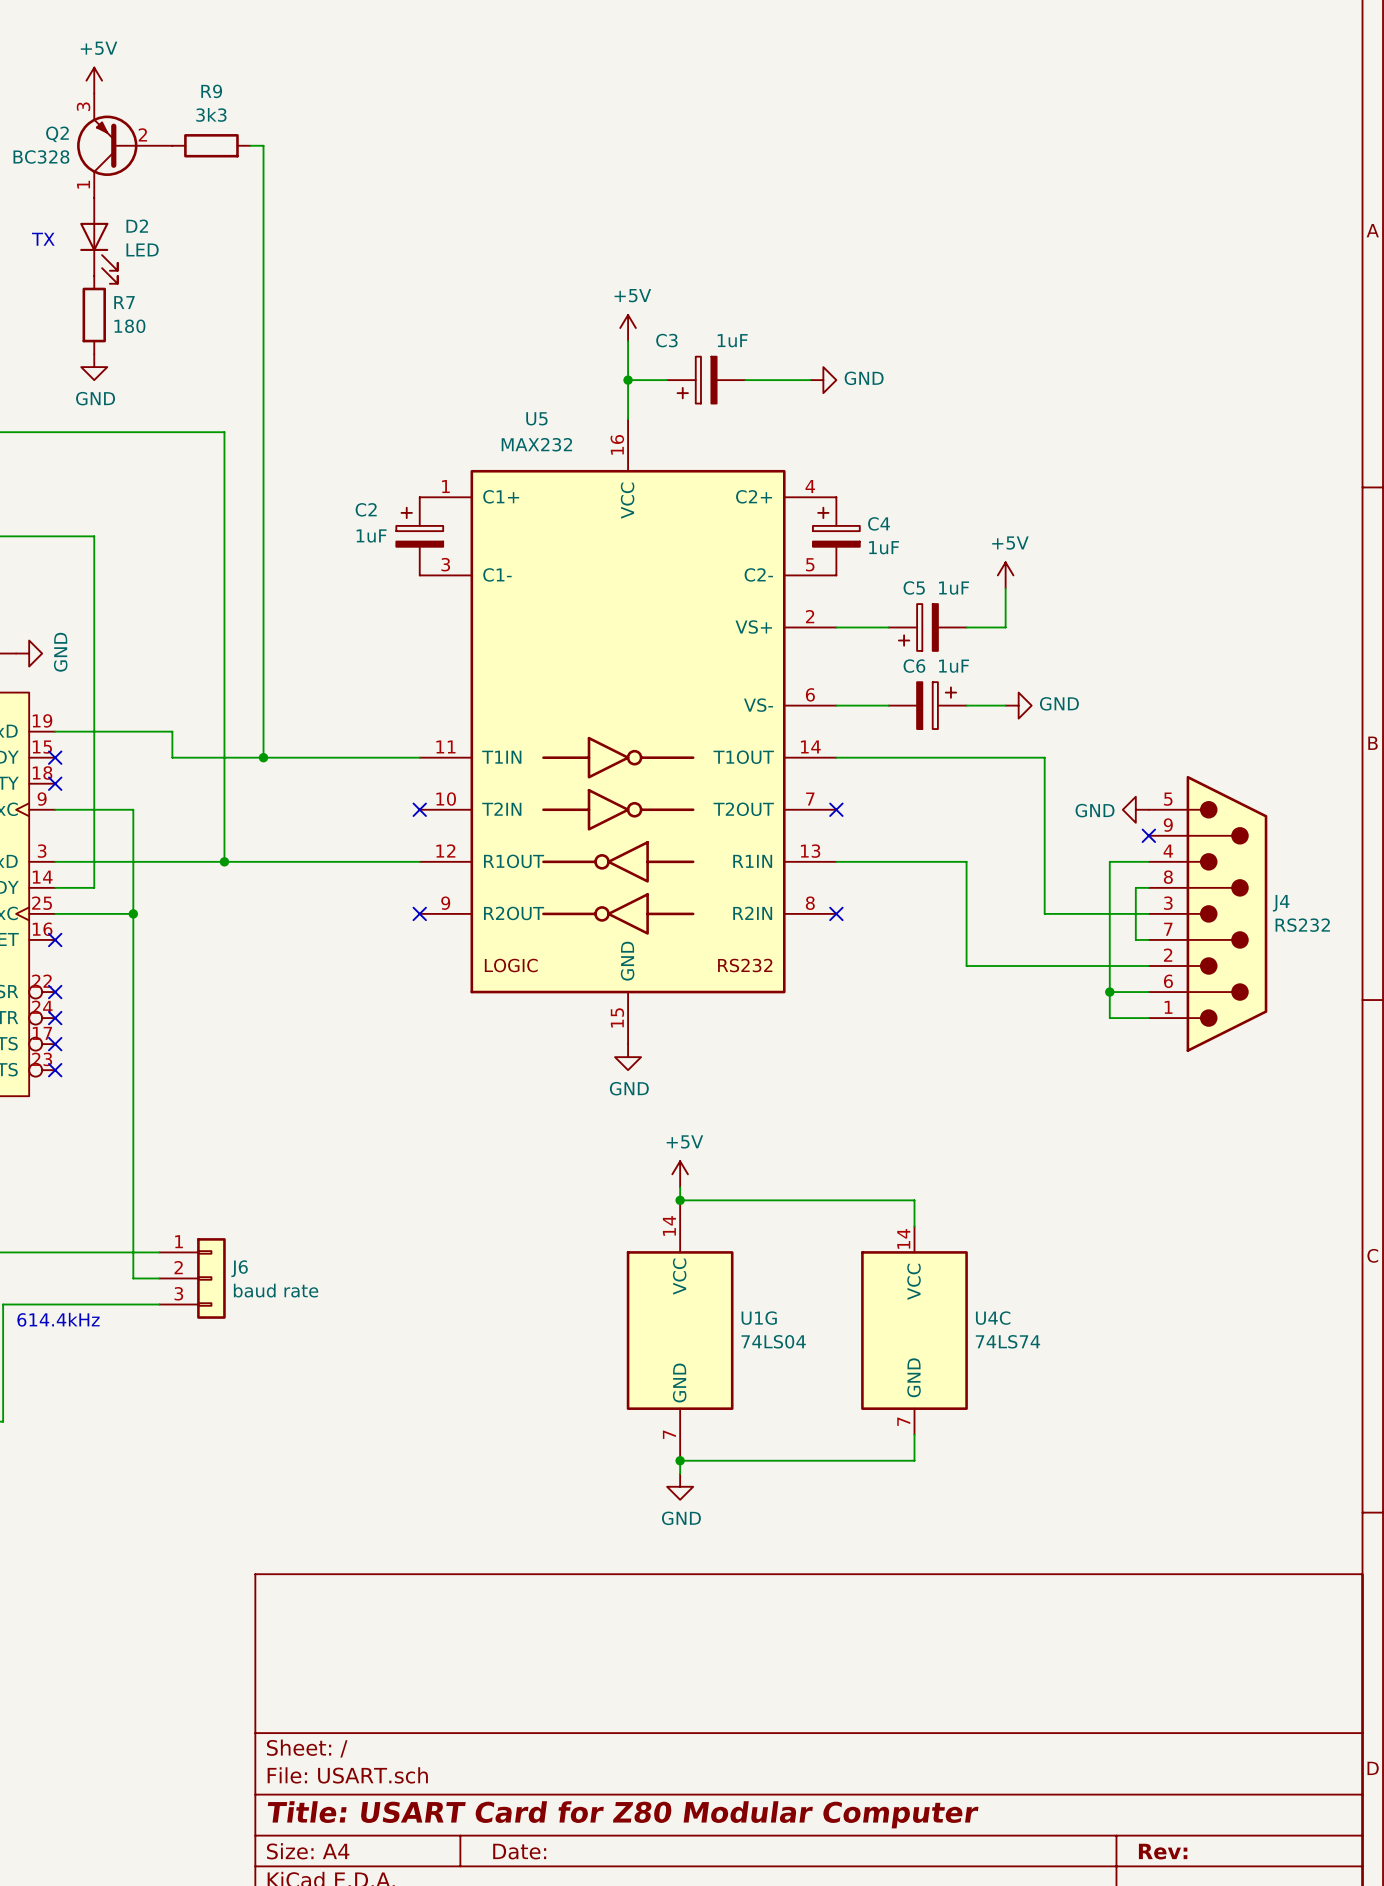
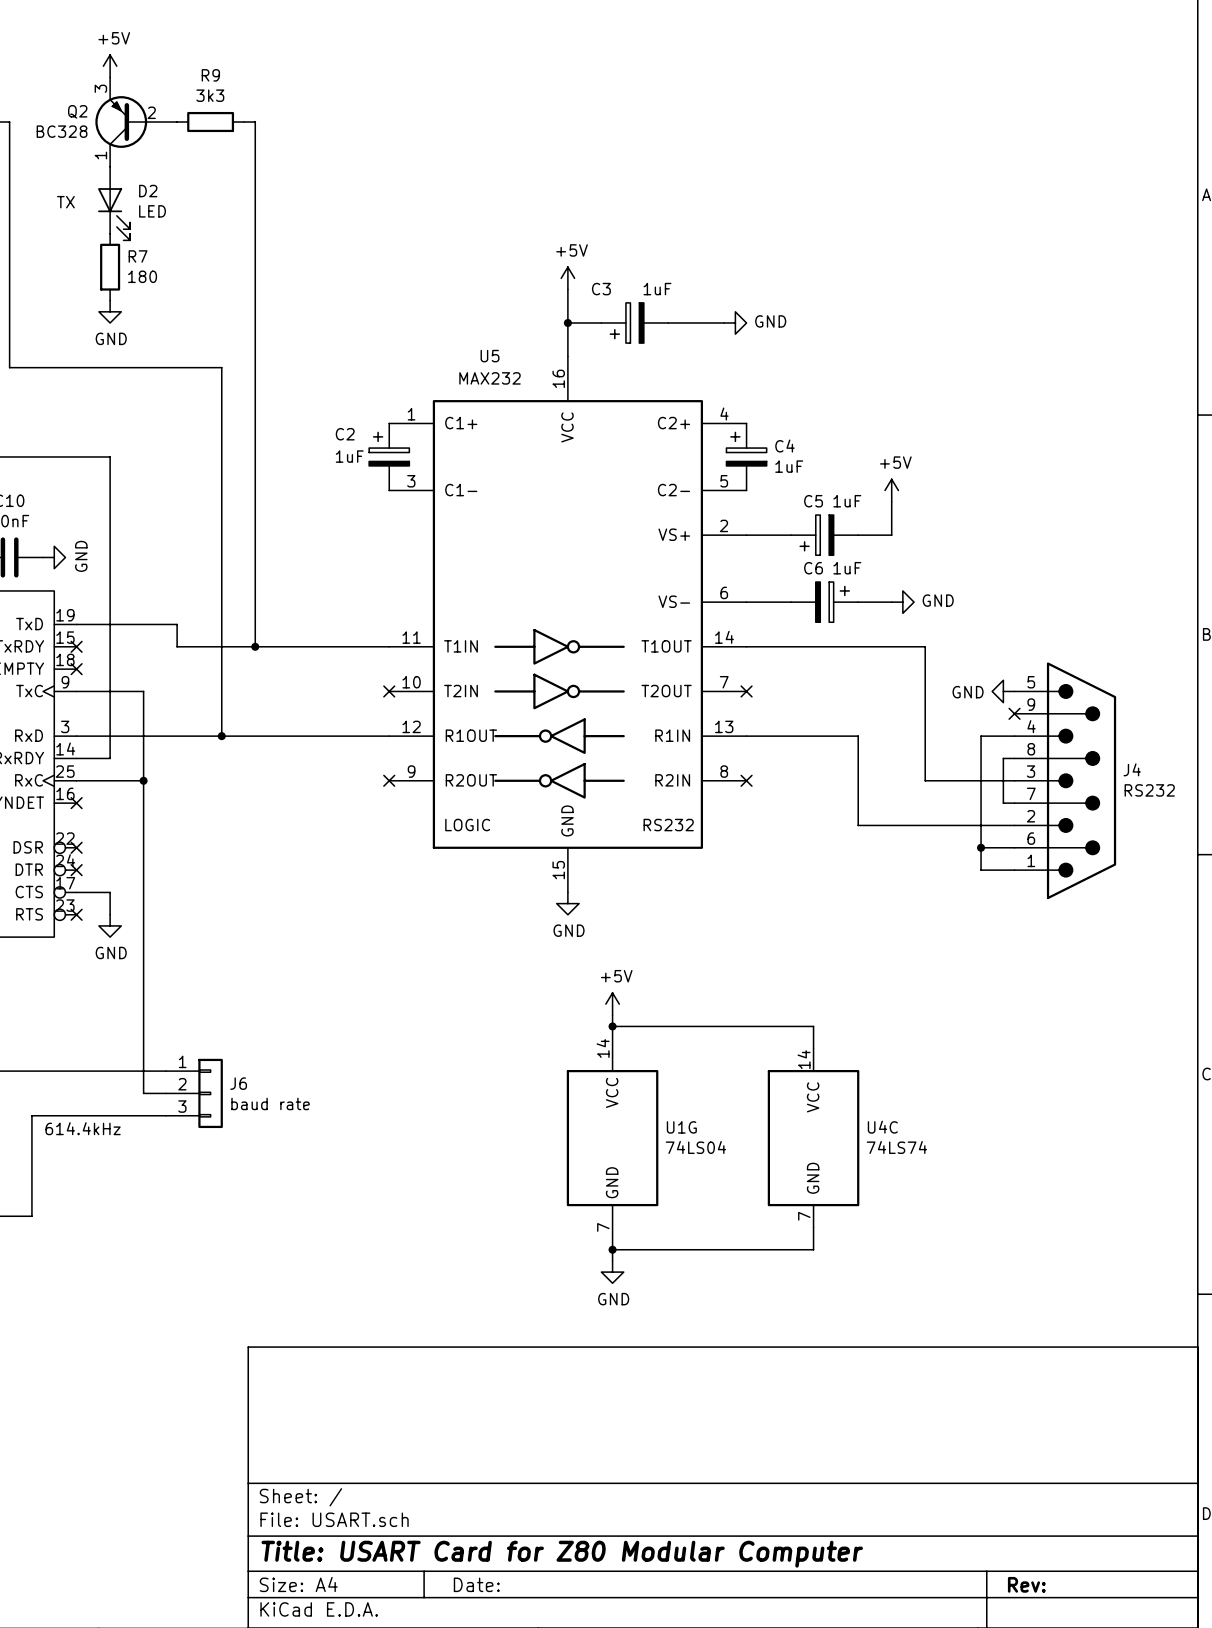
wire: none -> (76, 892) (110, 892) (110, 914)
no-connect mark: (55, 1044) -> none
power symbol: none -> GND (110, 925)

